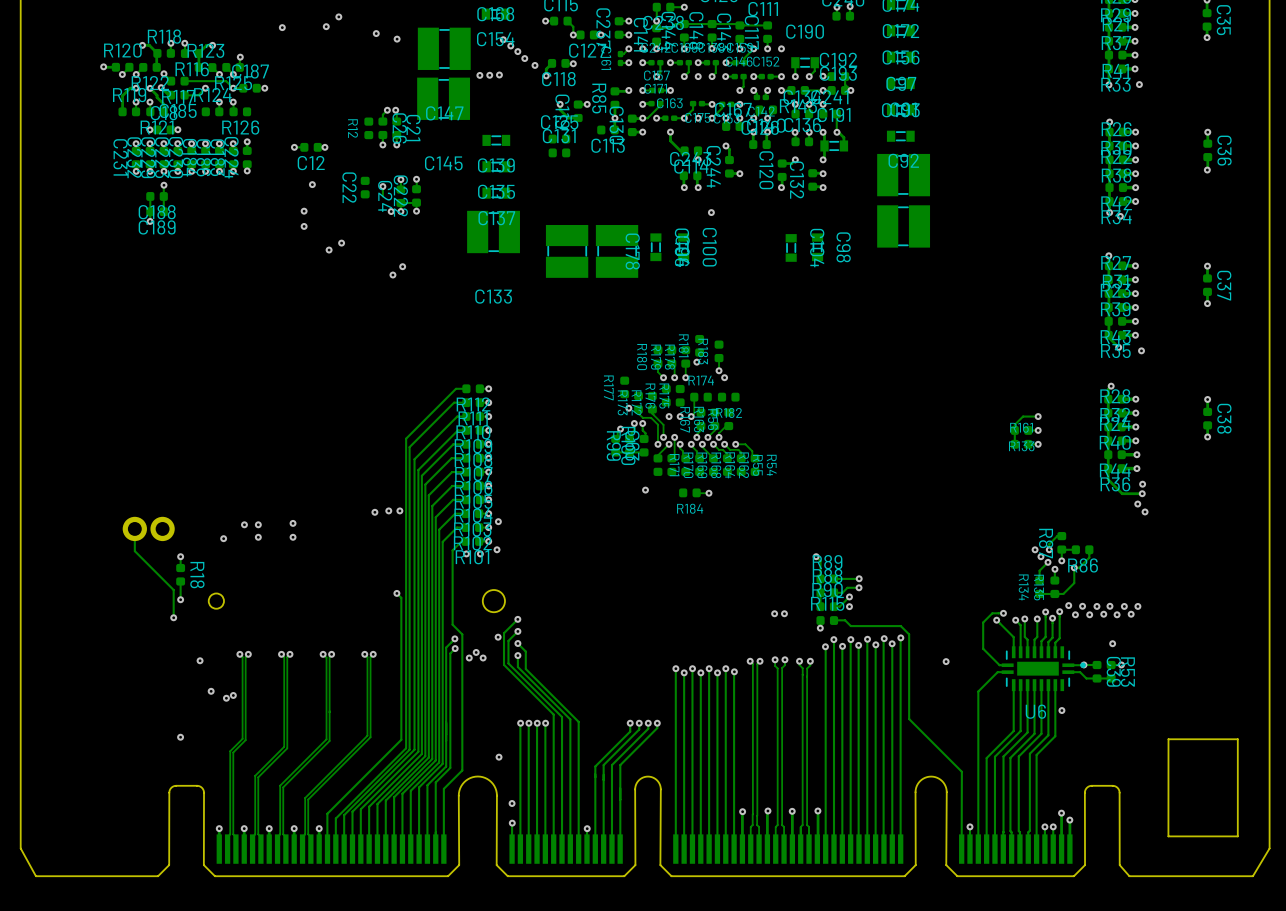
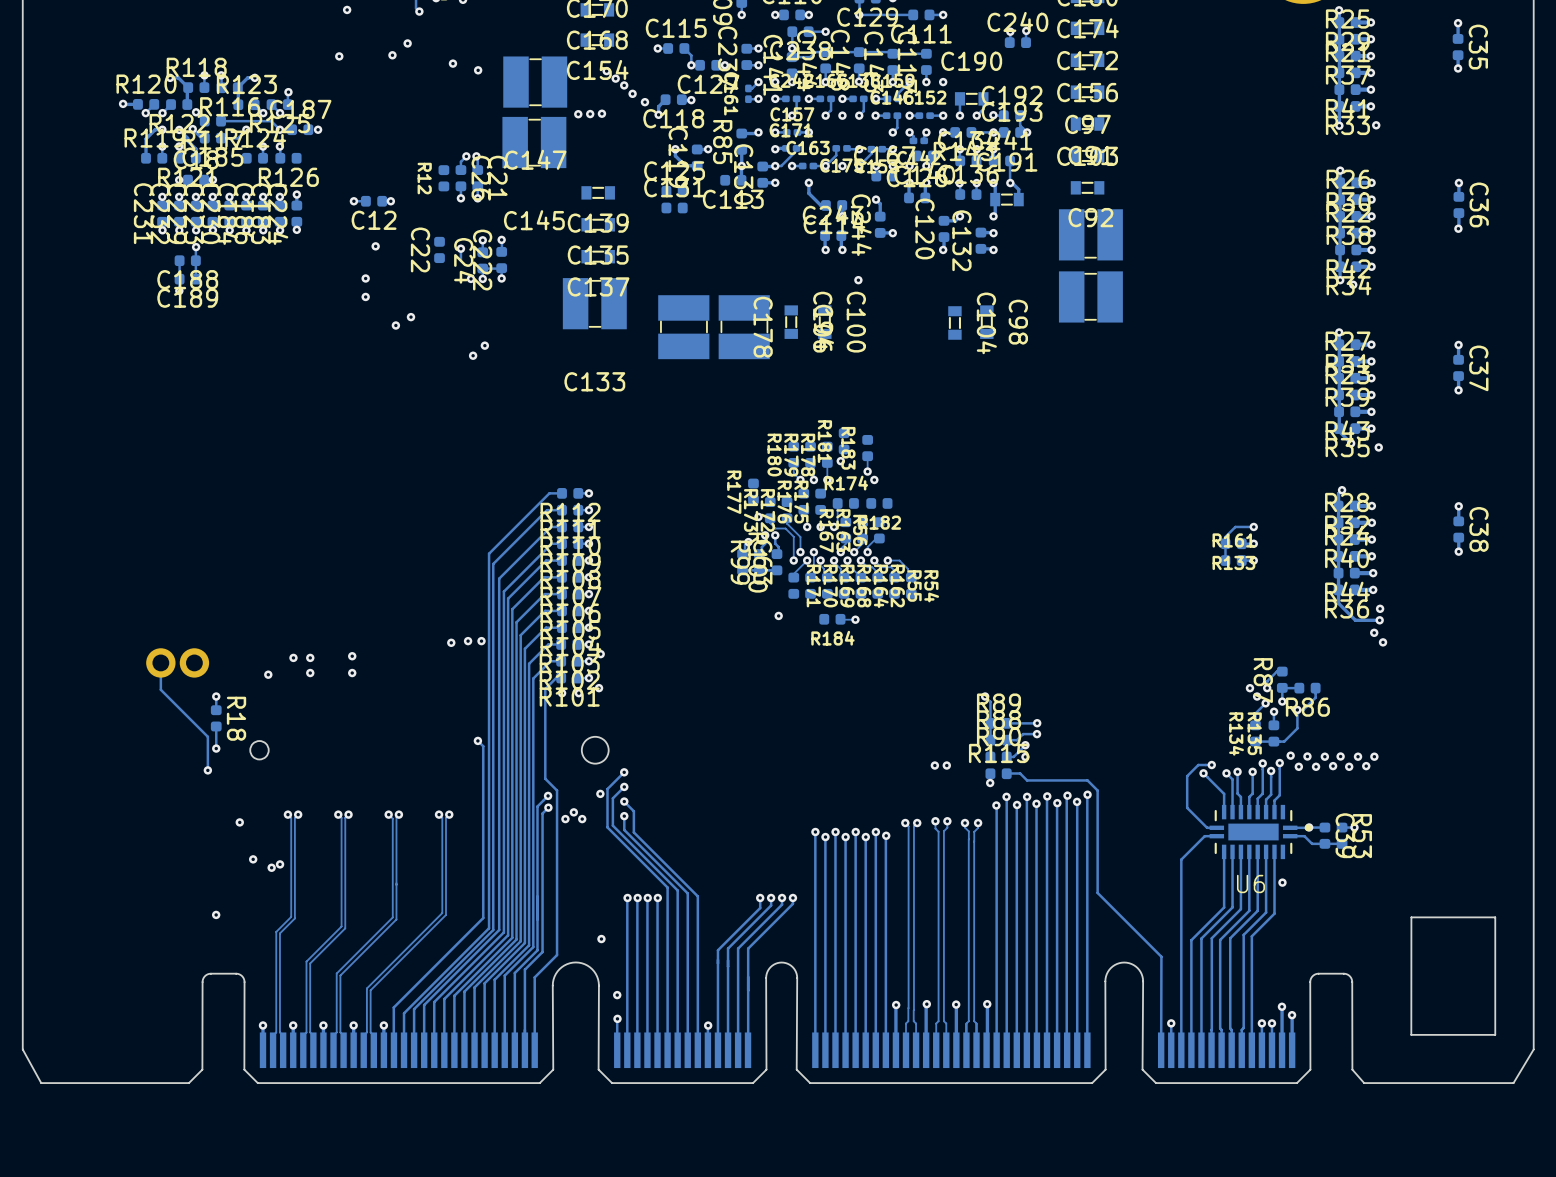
via: (1112, 643) -> none
via: (946, 661) -> none

